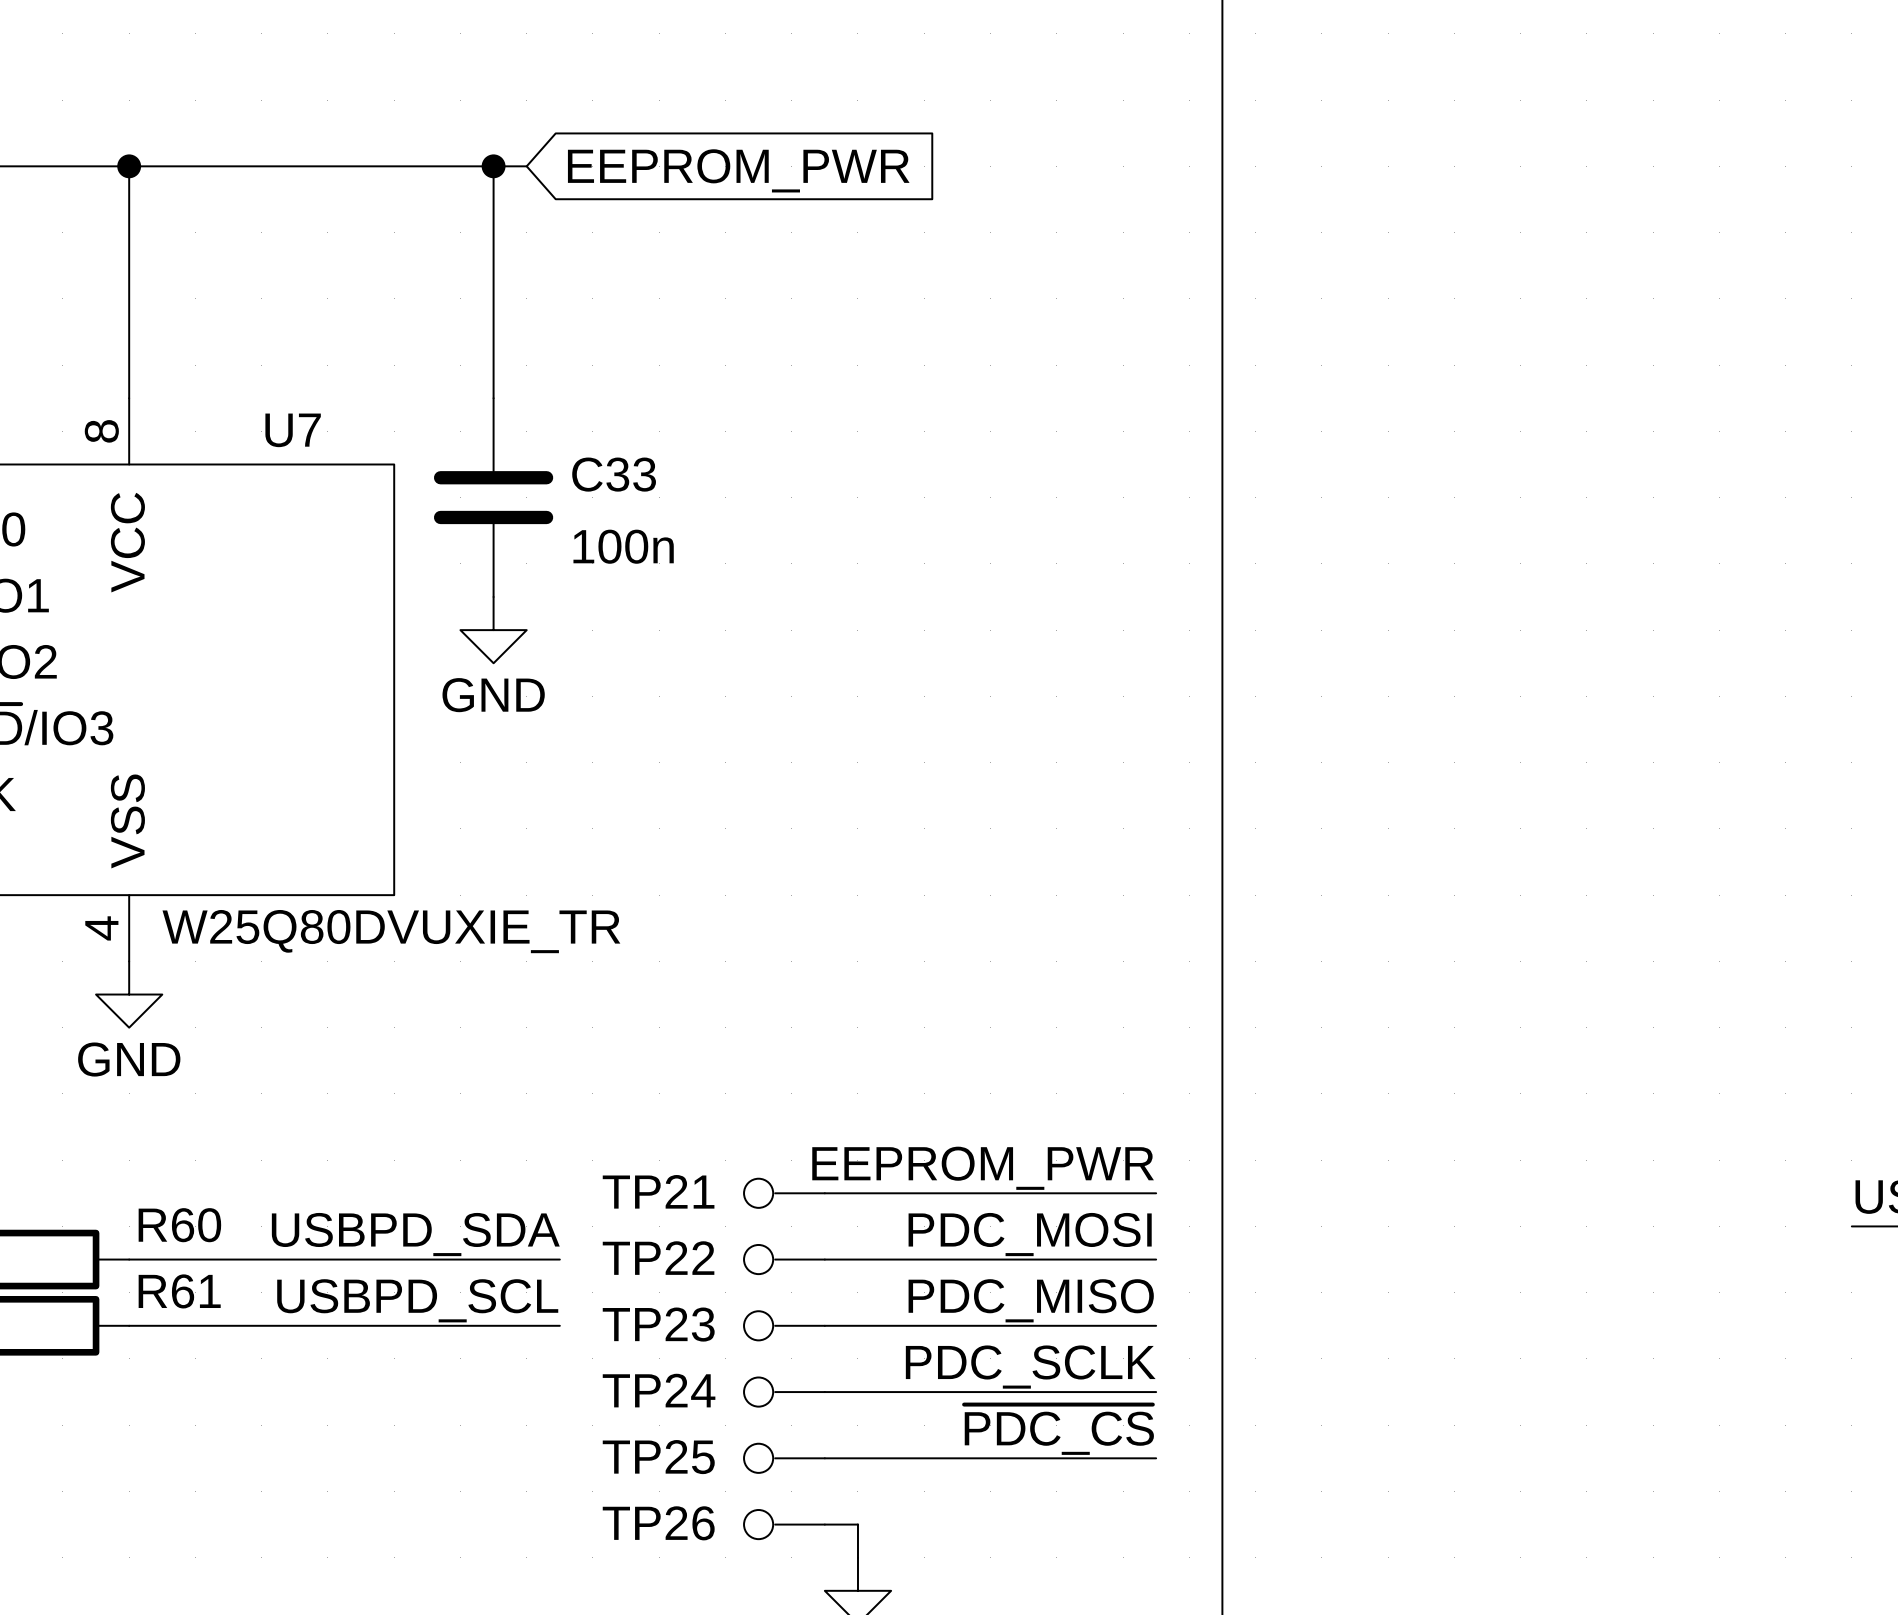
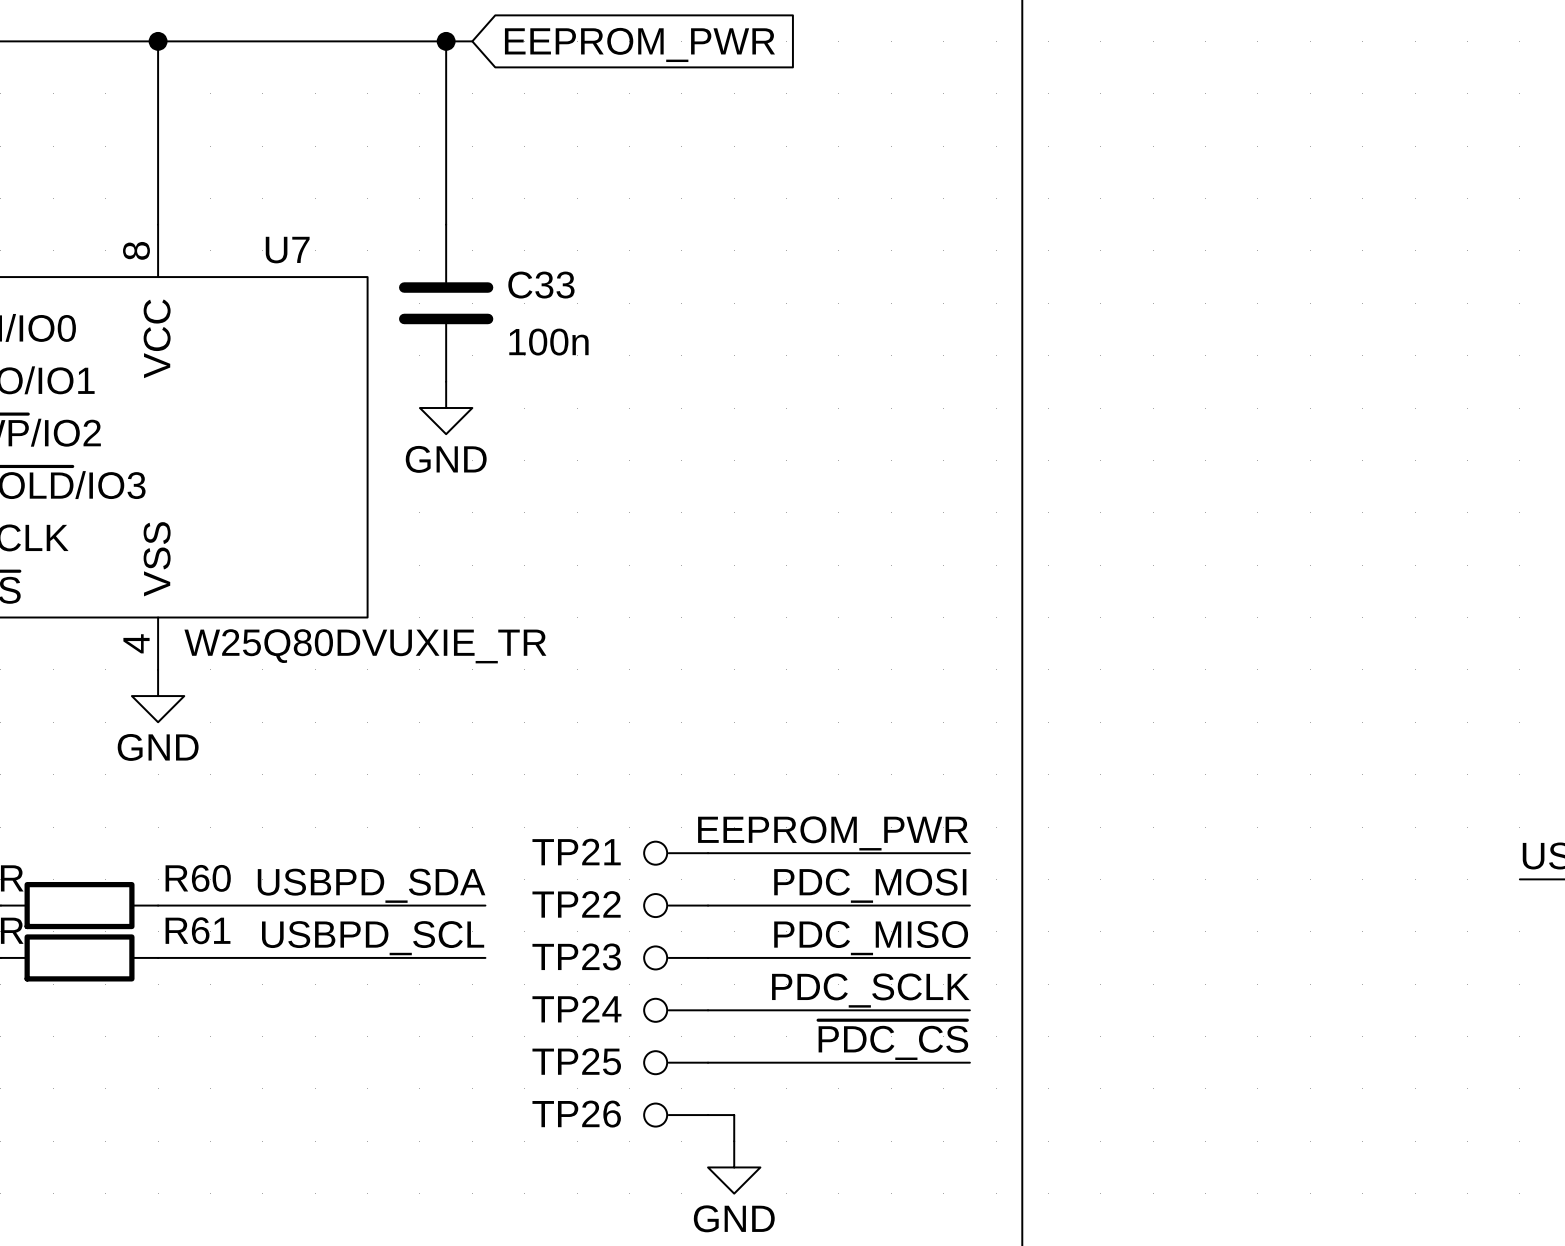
label position: USBPD_SDA (415, 1234) -> USBPD_SDA (371, 885)
wire: (543, 1259) (559, 1259) -> none
label position: USBPD_SCL (417, 1300) -> USBPD_SCL (373, 938)
wire: (543, 1325) (559, 1325) -> none

